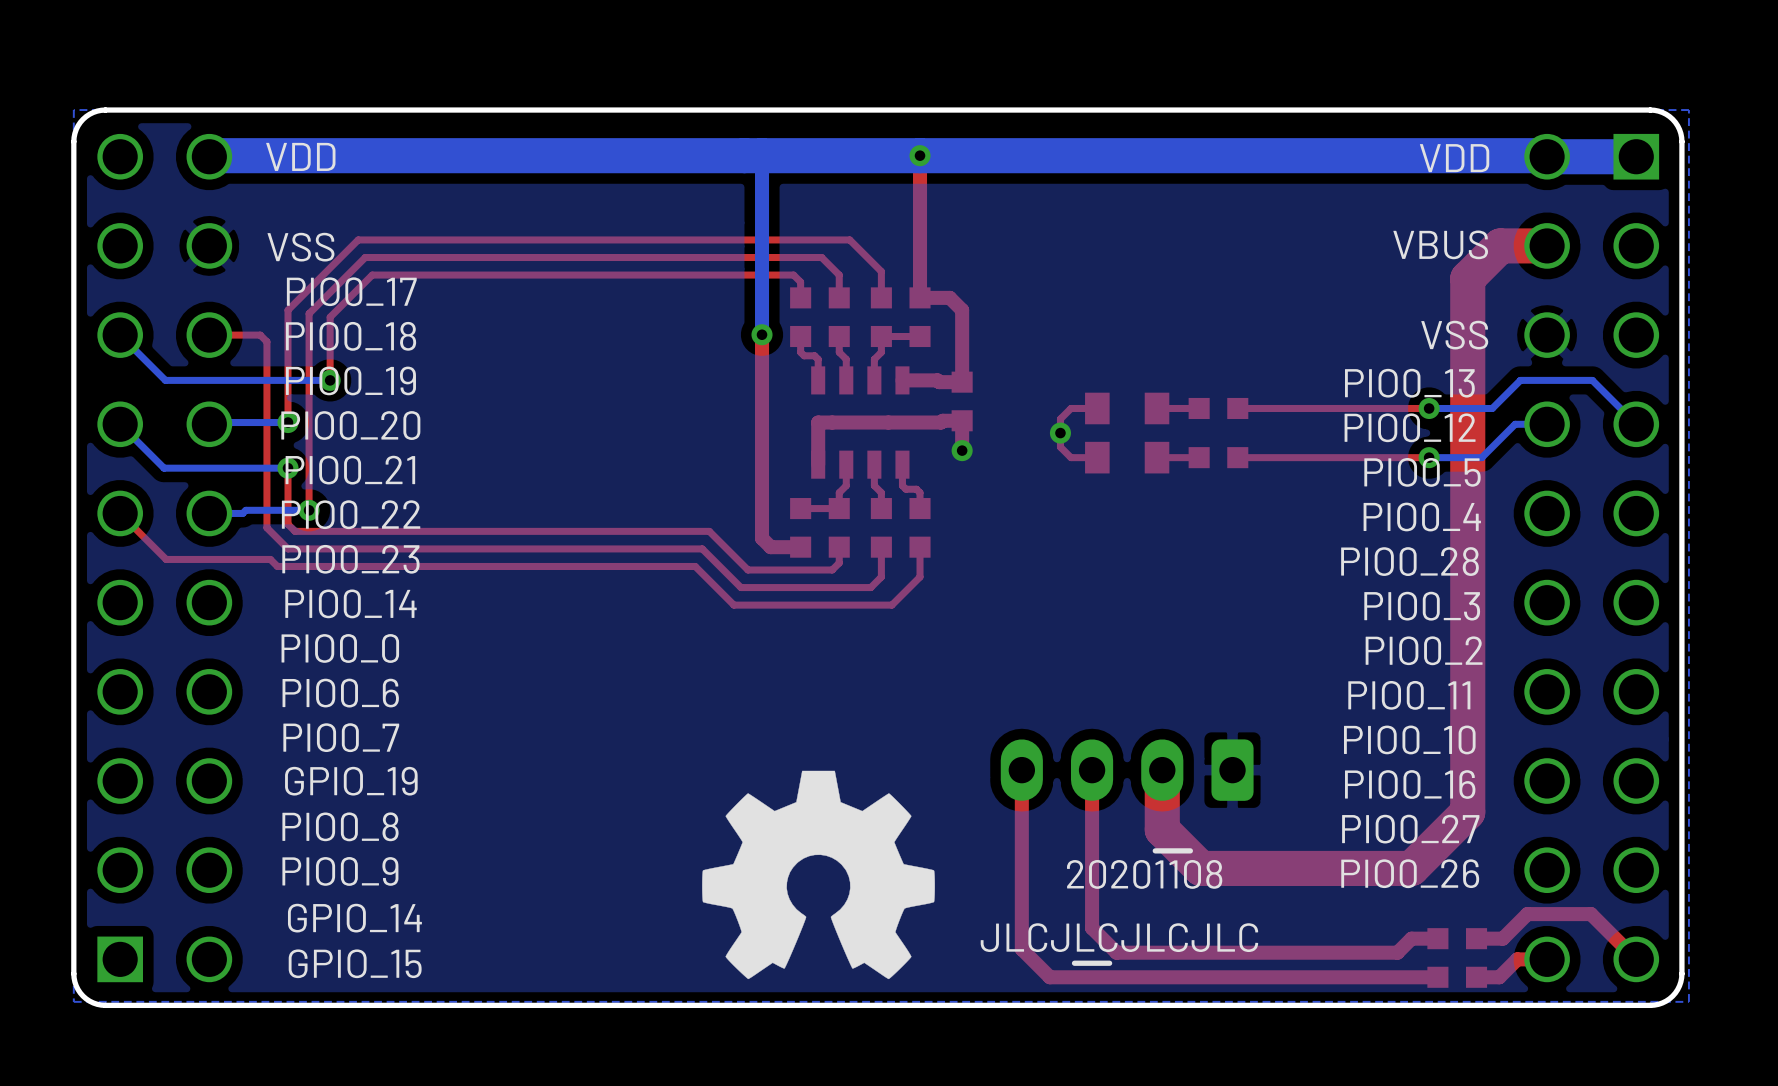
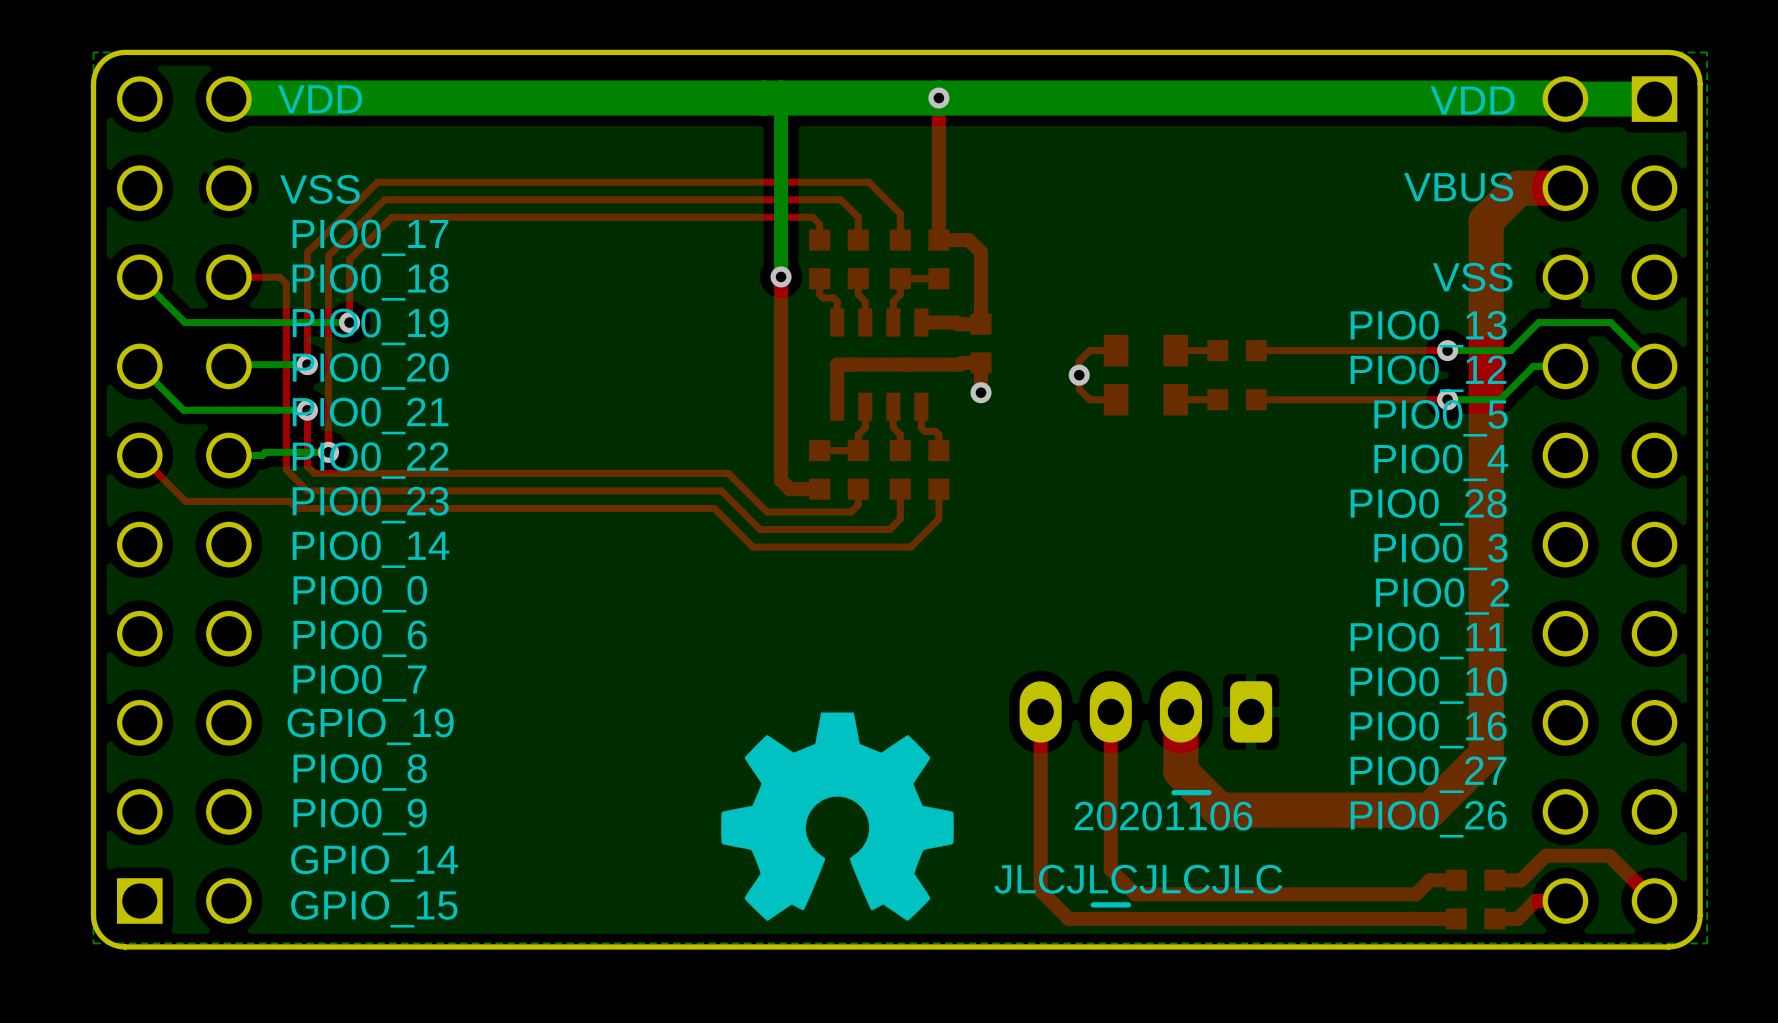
drawing shape: [1067, 848, 1223, 889] -> [1074, 789, 1253, 831]

